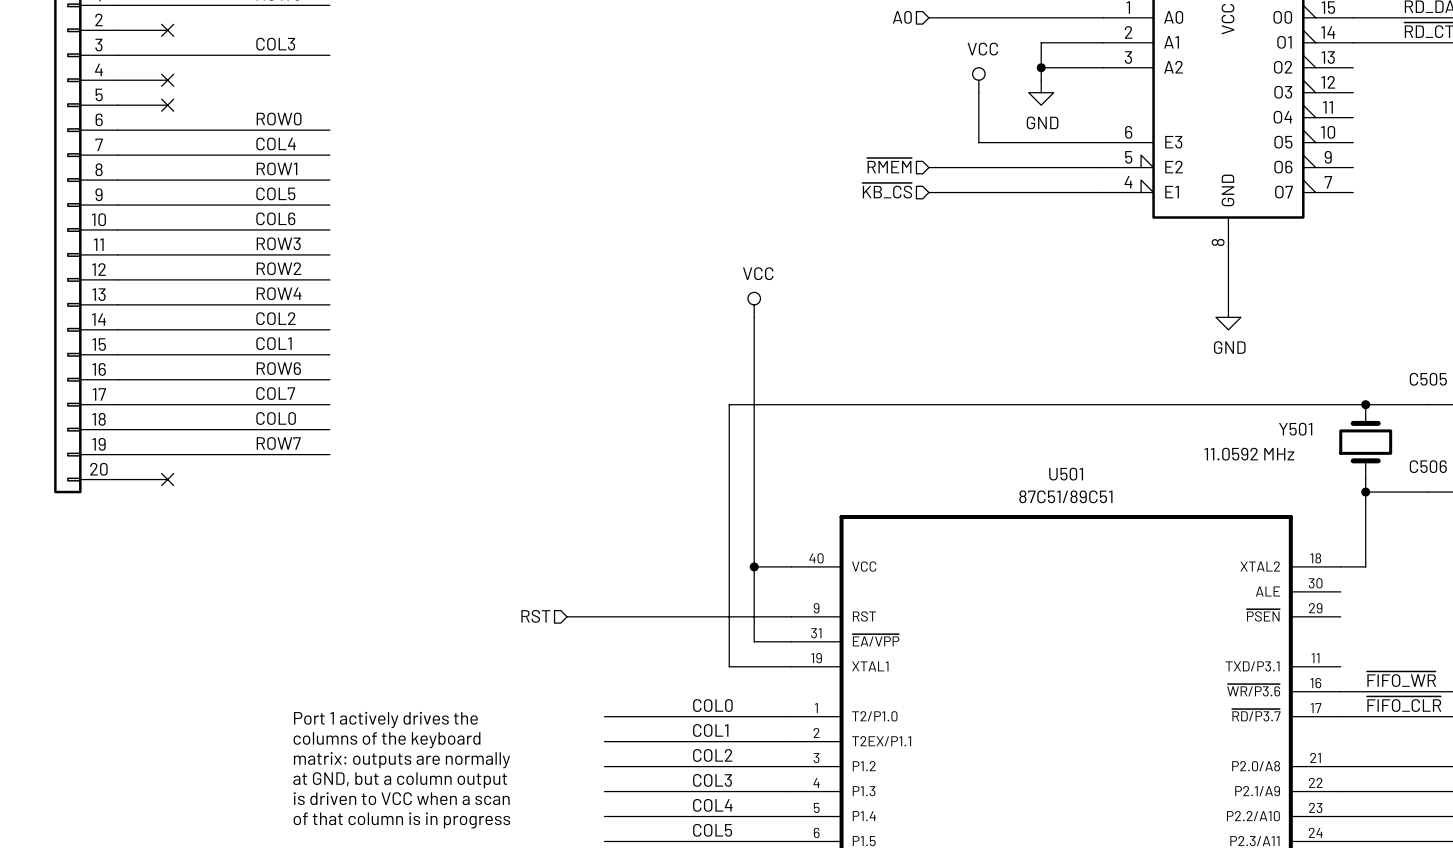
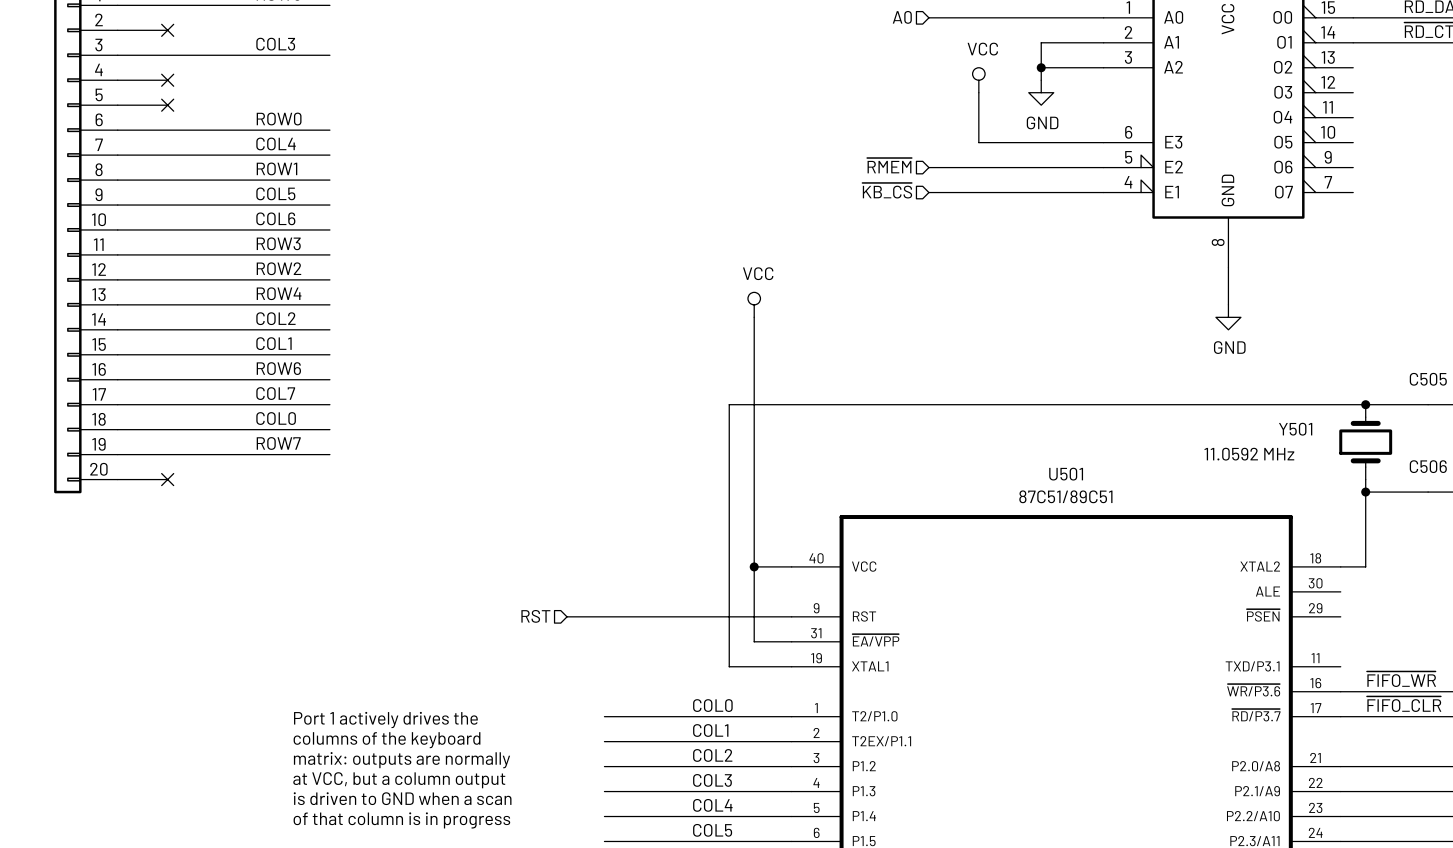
text: at GND, but a column output (400, 780) -> at VCC, but a column output (399, 780)
text: is driven to VCC when a scan (401, 798) -> is driven to GND when a scan (402, 798)

